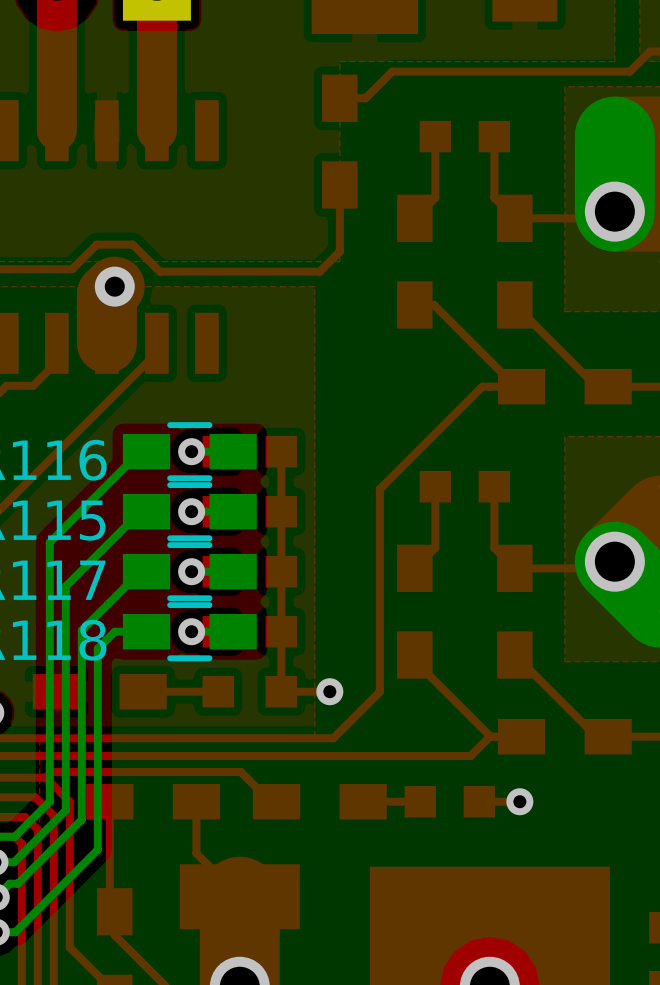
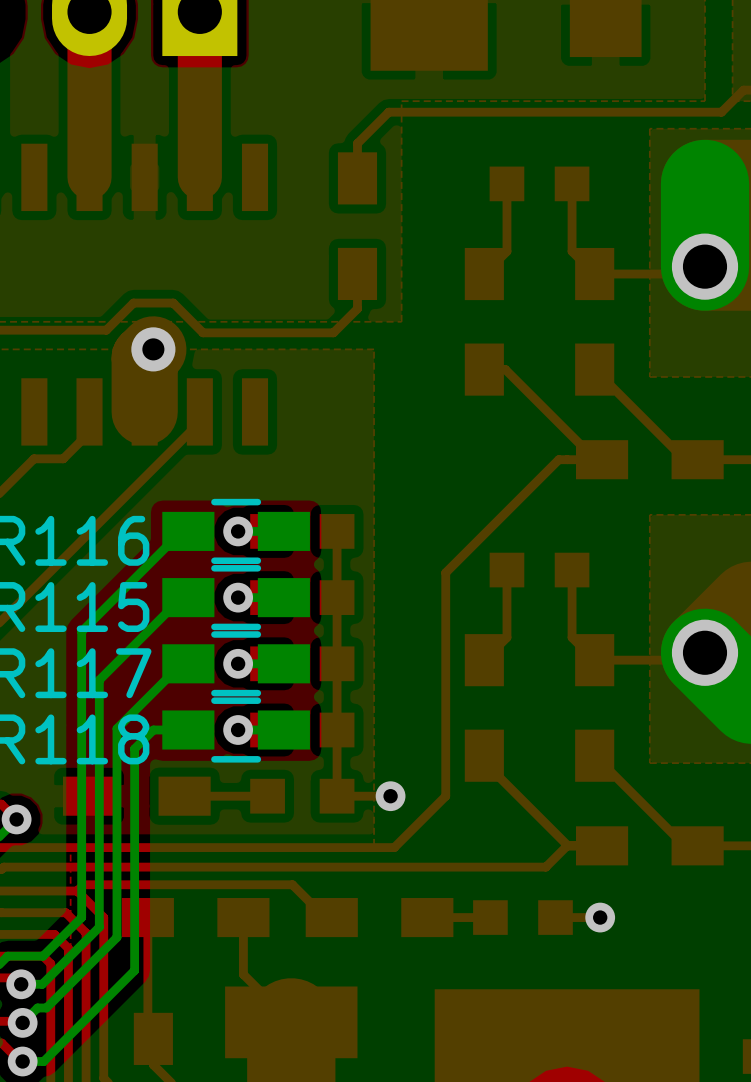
top track: (392, 71) (365, 98) (339, 98) -> (459, 112) (388, 112) (357, 143) (357, 178)
part position: (339, 141) -> (357, 226)
top track: (339, 184) (339, 251) (319, 271) (278, 271) -> (357, 273) (357, 308) (333, 332)

